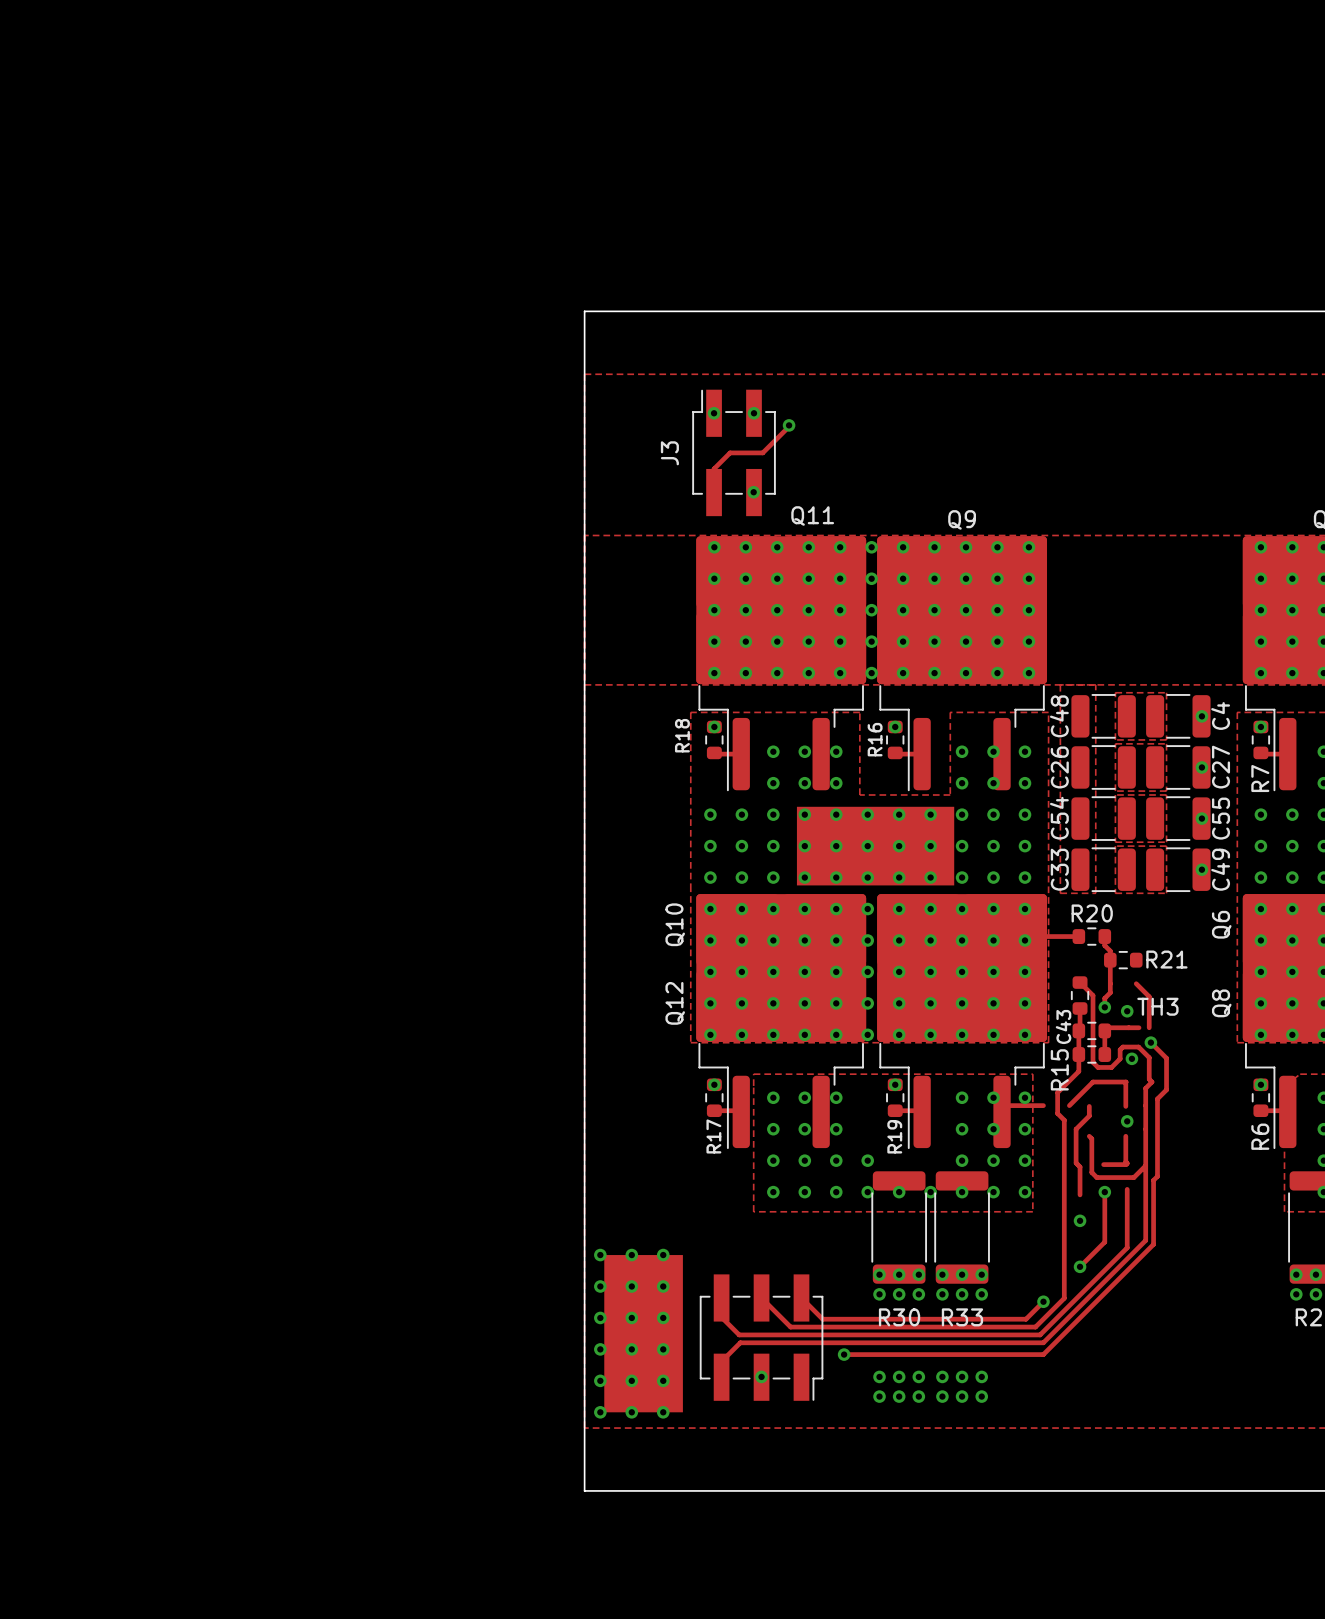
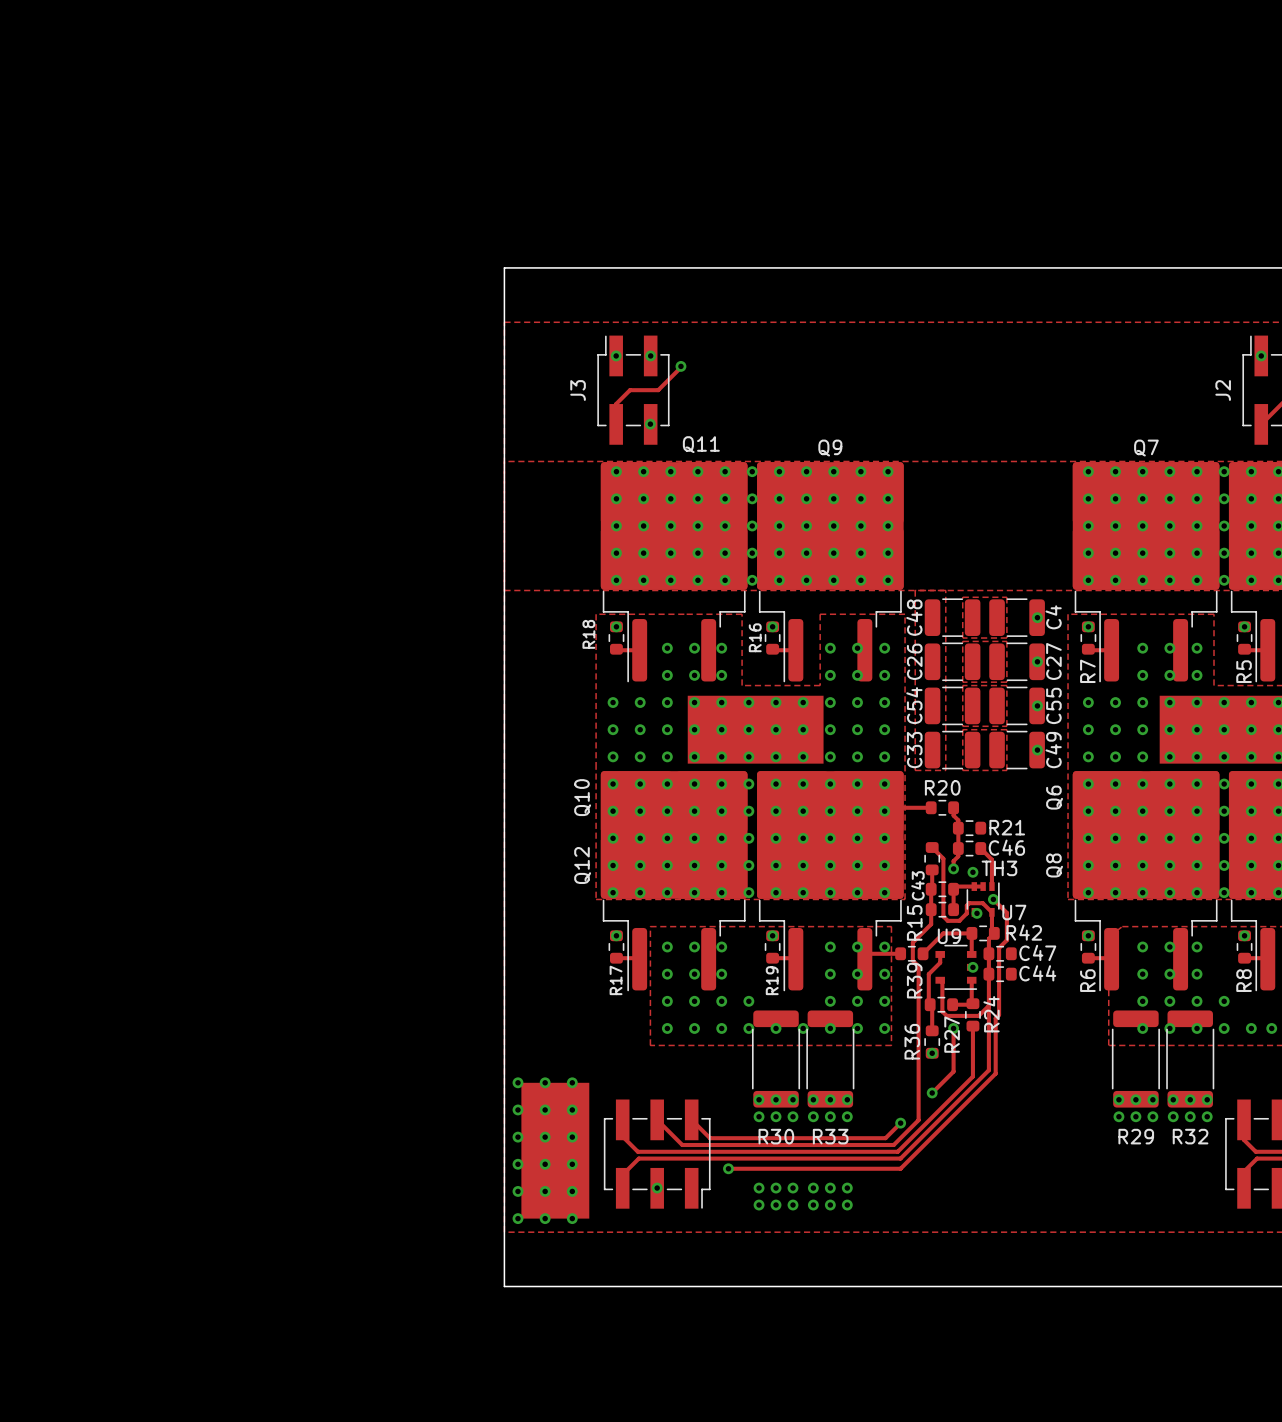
C46: none -> (969, 848)
U7: none -> (983, 899)
R42: none -> (983, 933)
R39: none -> (911, 953)
C47: none -> (1000, 953)
U9: none -> (956, 967)
C44: none -> (1000, 974)
R27: none -> (941, 1004)
R24: none -> (972, 1014)
R36: none -> (932, 1042)

